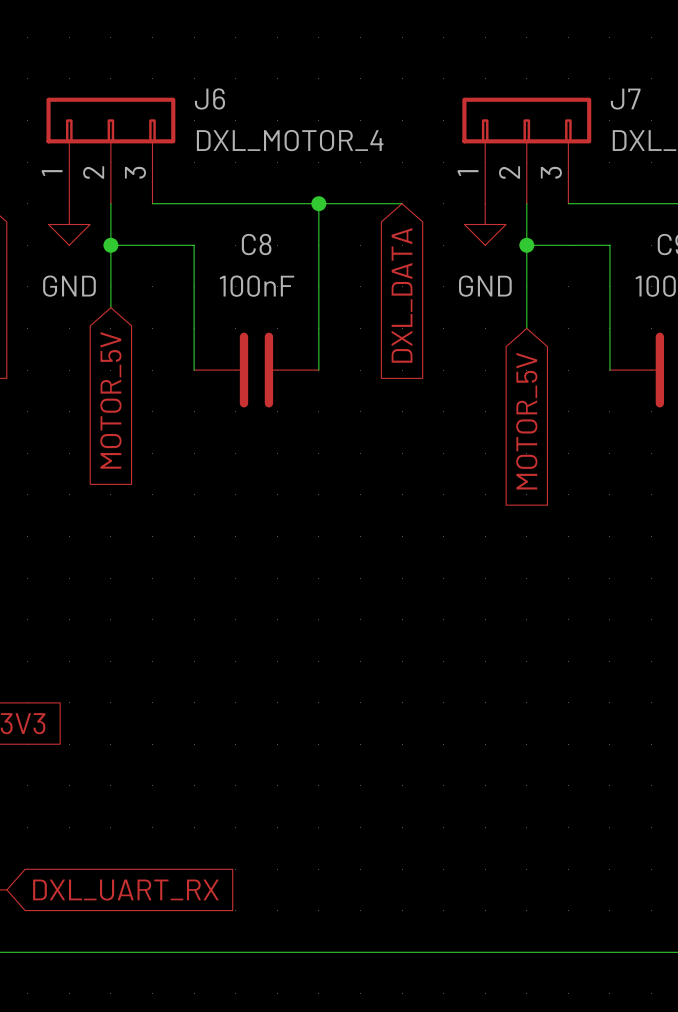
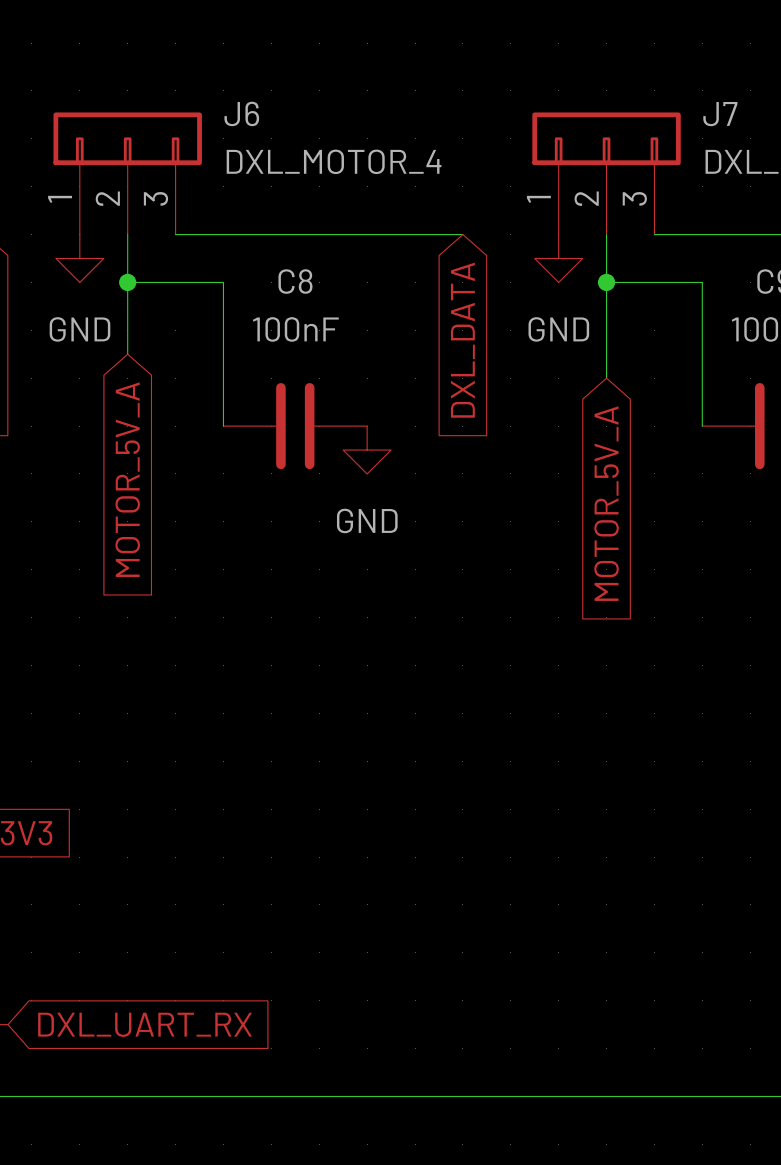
wire: (318, 203) (318, 370) -> none
junction: (318, 203) -> none
power symbol: none -> GND (367, 450)
global label: MOTOR_5V (110, 400) -> MOTOR_5V_A (127, 479)
global label: MOTOR_5V (526, 421) -> MOTOR_5V_A (606, 503)

